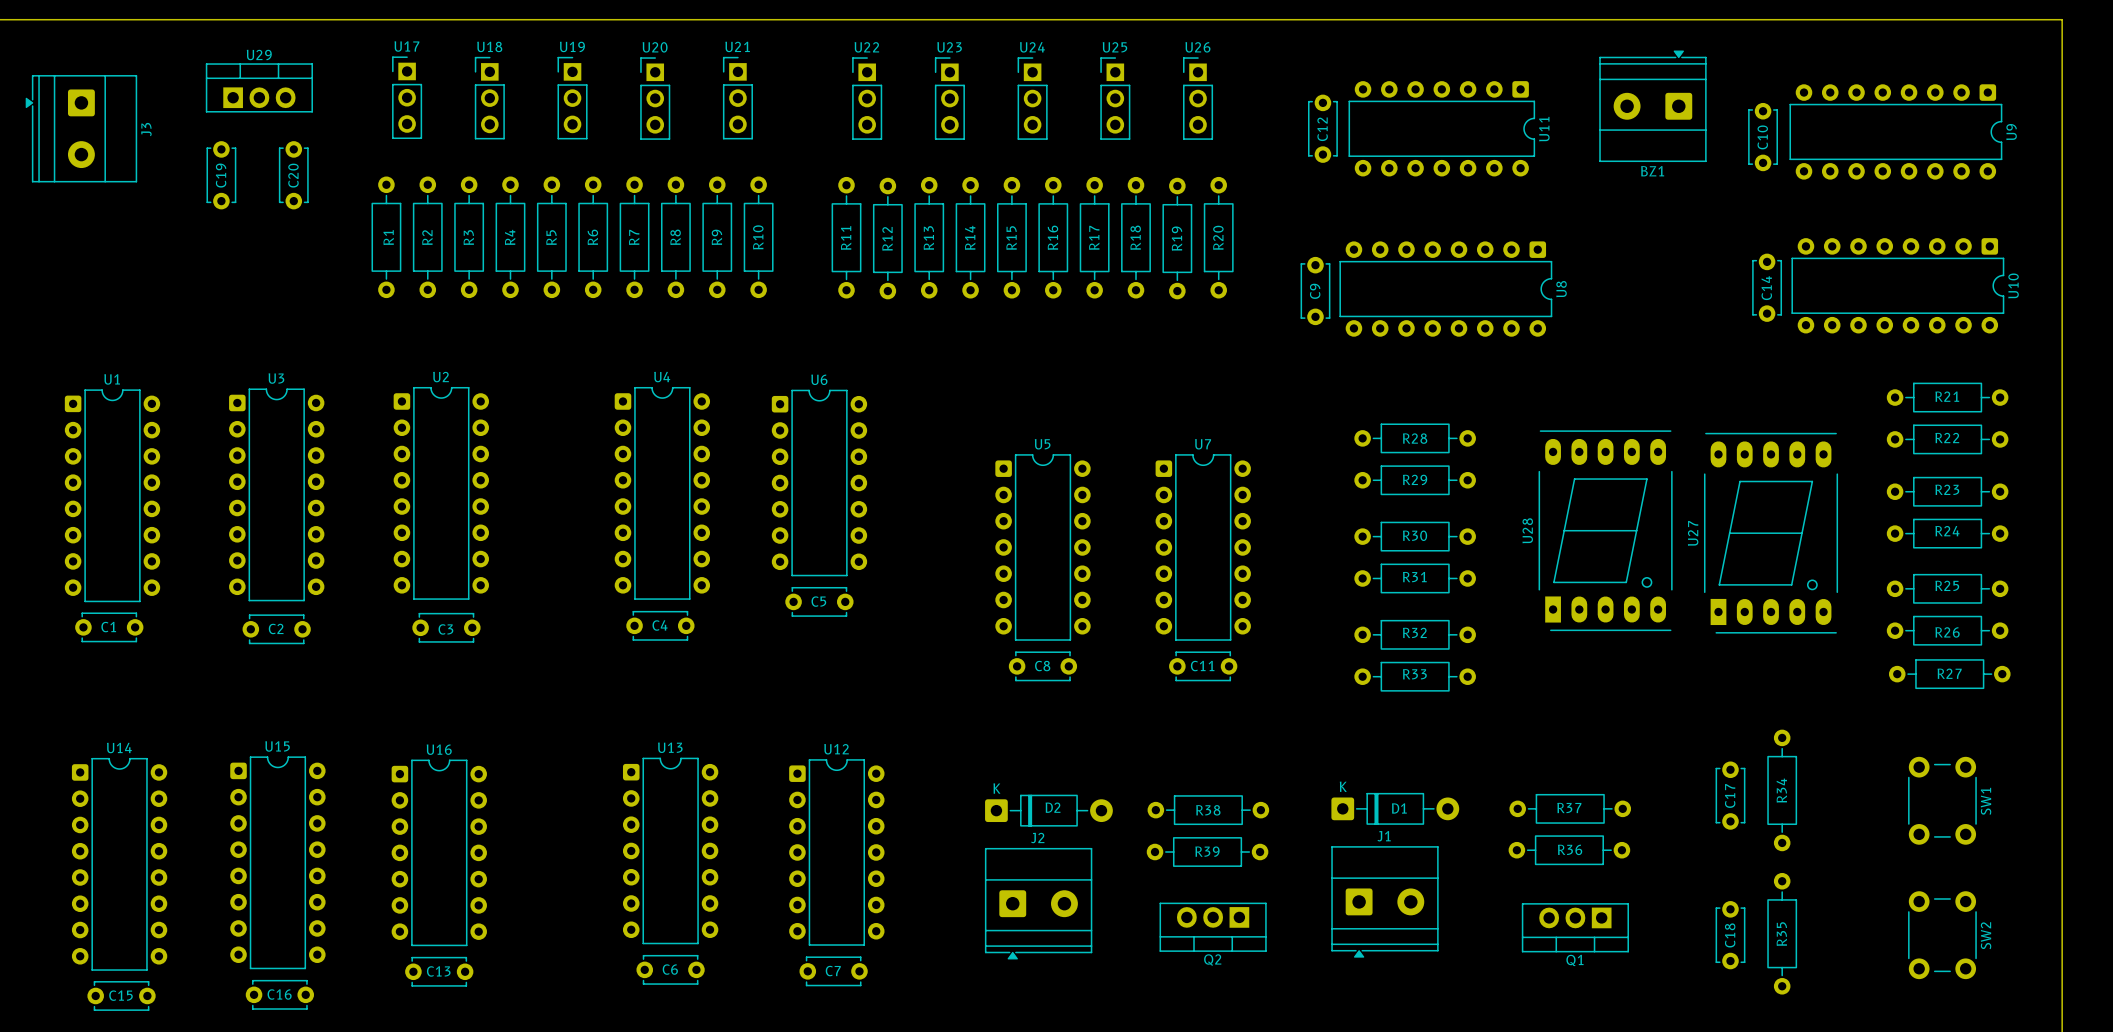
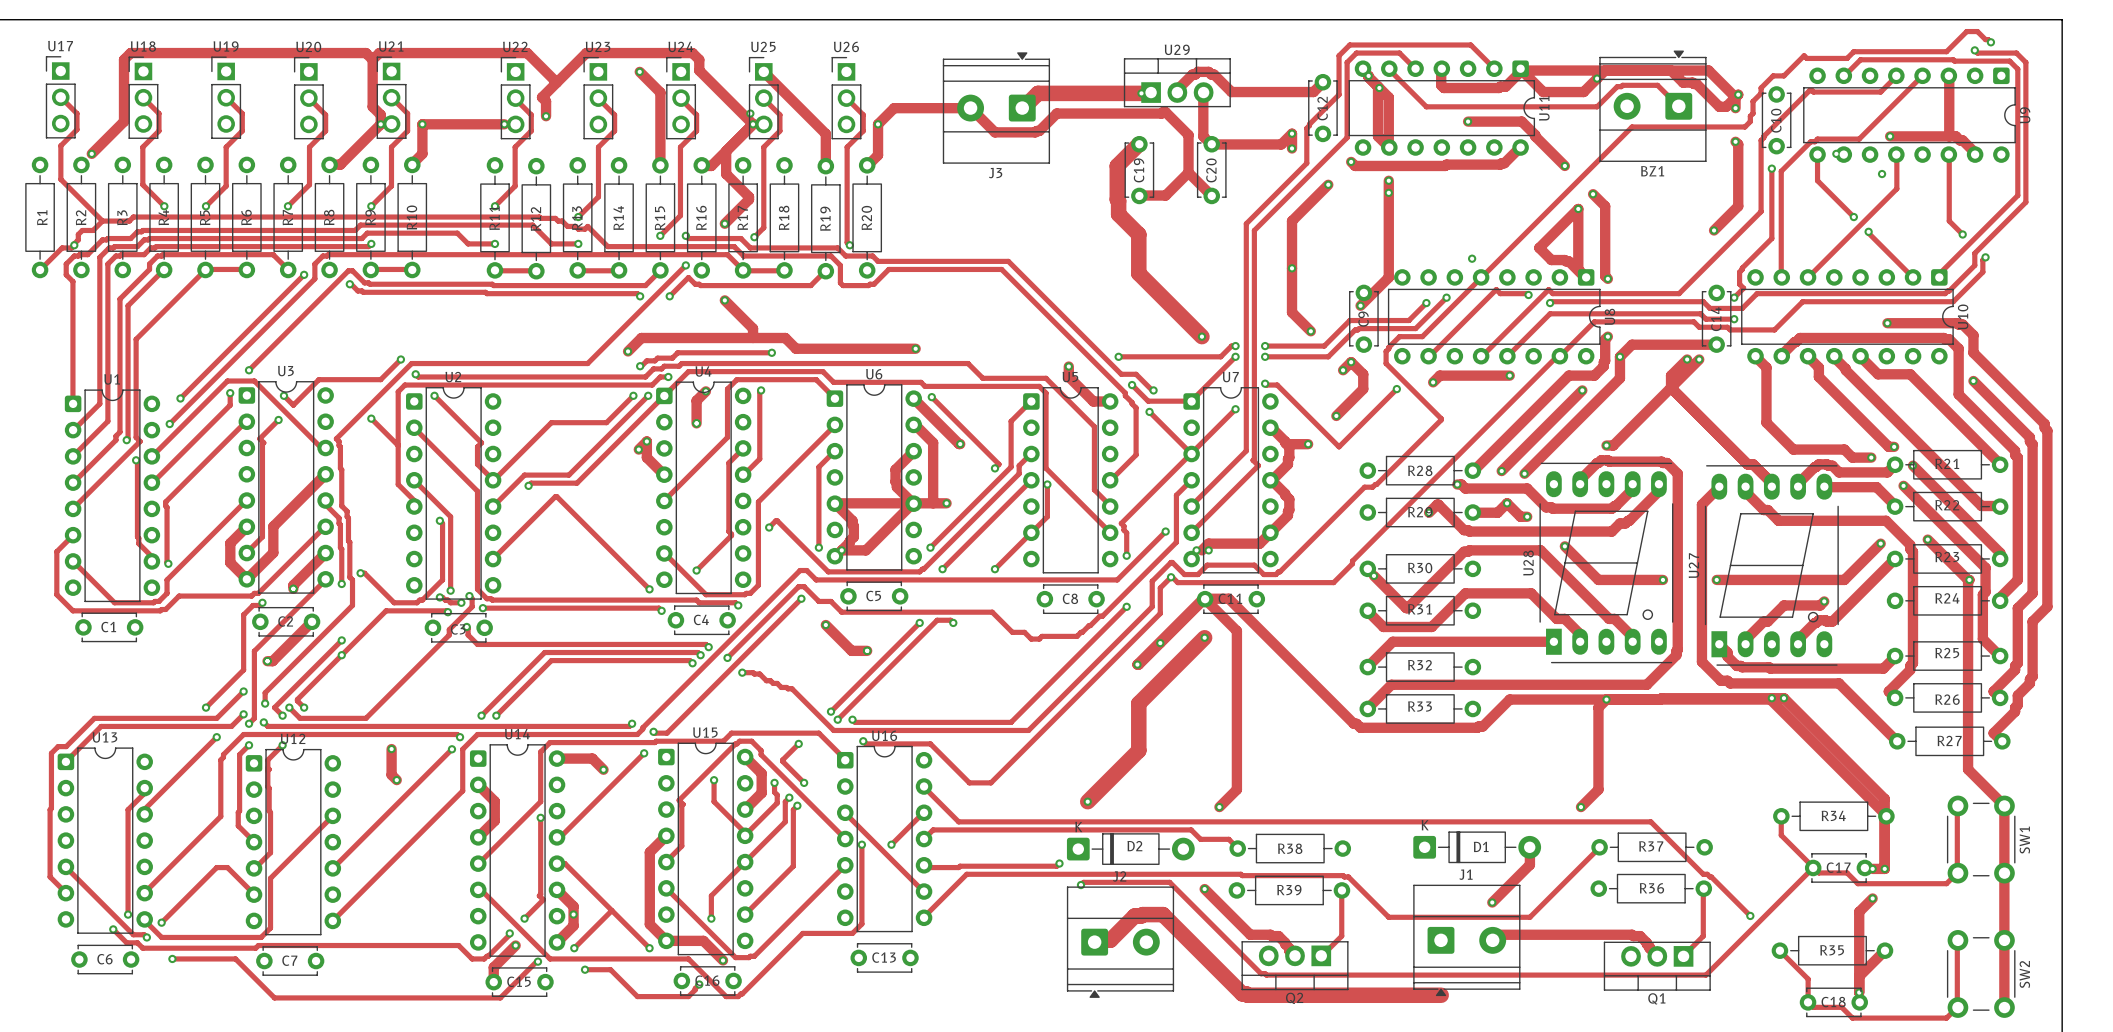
track: none -> (1990, 42) (1977, 31) (1966, 31) (1946, 51) (1853, 51) (1847, 58) (1806, 58) (1804, 55) (1783, 75) (1773, 75) (1761, 88) (1761, 93) (1753, 101) (1753, 113) (1750, 116) (1750, 121) (1744, 126) (1632, 126) (1422, 336) (1399, 336) (1386, 351) (1386, 363) (1441, 419) (1376, 484) (1372, 487) (1364, 487) (1275, 574) (1263, 574) (1254, 565) (1207, 565) (1197, 574) (1184, 574) (1171, 562) (1152, 581) (1152, 606) (1028, 730) (833, 730) (792, 688) (781, 687) (777, 683) (766, 680) (759, 674) (742, 672)
via: none -> (1990, 42)
track: none -> (1974, 50) (1977, 53) (2016, 53) (2025, 62) (2025, 202) (1974, 253) (1974, 265) (1945, 293) (1757, 293) (1742, 308) (1710, 308) (1703, 301) (1550, 303)
via: none -> (1974, 50)
track: none -> (372, 59) (372, 106) (380, 114) (380, 124) (340, 164) (329, 164)
track: none -> (372, 59) (365, 53) (130, 53) (124, 59) (124, 121) (91, 153)
track: none -> (372, 59) (379, 53) (527, 53) (556, 82)
track: none -> (1389, 68) (1426, 106) (1597, 106) (1617, 86) (1622, 85) (1657, 85) (1678, 106)
track: none -> (1415, 68) (1399, 53) (1356, 53) (1347, 62) (1347, 137) (1254, 230) (1253, 460) (1258, 465) (1191, 532)
track: none -> (1441, 68) (1441, 85) (1443, 88) (1505, 86) (1521, 70) (1708, 70) (1735, 97) (1735, 108)
track: none -> (1494, 68) (1470, 44) (1349, 44) (1339, 55) (1339, 94) (1306, 128) (1306, 163) (1246, 223) (1246, 450) (1191, 506)
track: none -> (1520, 68) (1543, 92) (1583, 92) (1605, 70)
track: none -> (1671, 70) (1683, 82) (1696, 83) (1719, 106) (1726, 106) (1738, 94)
track: none -> (639, 71) (660, 92) (660, 165)
via: none -> (639, 71)
track: none -> (763, 71) (825, 133) (825, 166)
track: none -> (1368, 75) (1388, 97) (1388, 147)
via: none -> (1368, 75)
track: none -> (1843, 75) (1860, 59) (2009, 61) (2017, 69) (2017, 195) (1939, 273) (1939, 277)
track: none -> (1896, 75) (1880, 92) (1809, 90) (1763, 136) (1761, 140) (1761, 211) (1679, 293) (1552, 293) (1548, 289) (1481, 356)
track: none -> (1922, 75) (1859, 139) (1817, 139) (1810, 141) (1781, 171) (1781, 277)
track: none -> (1948, 75) (1949, 136)
via: none -> (1597, 78)
track: none -> (1322, 82) (1313, 92) (1231, 92) (1214, 74) (1208, 71) (1197, 71) (1177, 89) (1177, 92)
track: none -> (1378, 86) (1378, 136) (1388, 147)
U29 position: (259, 87) -> (1177, 82)
via: none -> (1379, 88)
track: none -> (1203, 92) (1203, 136) (1211, 144)
track: none -> (1141, 93) (1037, 93) (1022, 108)
via: none -> (1141, 93)
via: none -> (1738, 94)
track: none -> (60, 97) (76, 113) (76, 129) (60, 145) (60, 179) (102, 221)
track: none -> (143, 97) (158, 113) (158, 131) (142, 147) (142, 184) (164, 206)
track: none -> (226, 97) (242, 113) (242, 131) (226, 147) (226, 186) (206, 206)
track: none -> (391, 97) (407, 113) (407, 131) (391, 147) (391, 186) (371, 206)
U17 position: (407, 97) -> (60, 97)
track: none -> (308, 98) (325, 114) (325, 131) (309, 147) (309, 184) (288, 206)
U18 position: (489, 98) -> (143, 97)
track: none -> (515, 98) (531, 114) (531, 131) (515, 147) (515, 186) (494, 206)
U19 position: (572, 98) -> (226, 97)
track: none -> (598, 98) (614, 114) (614, 131) (598, 147) (598, 196) (578, 217)
U20 position: (655, 98) -> (308, 98)
track: none -> (681, 98) (696, 114) (696, 131) (680, 147) (680, 215) (660, 235)
U21 position: (737, 98) -> (391, 97)
track: none -> (763, 98) (779, 114) (779, 131) (763, 147) (763, 227) (754, 237)
track: none -> (846, 98) (863, 114) (863, 131) (847, 147) (847, 242) (849, 245)
U22 position: (867, 98) -> (515, 98)
U23 position: (949, 98) -> (598, 98)
U24 position: (1032, 98) -> (681, 98)
U25 position: (1115, 98) -> (763, 98)
U26 position: (1198, 98) -> (846, 98)
track: none -> (970, 108) (994, 132) (1035, 132) (1039, 131) (1056, 113) (1165, 112) (1188, 135) (1188, 172)
track: none -> (970, 108) (894, 108) (878, 124) (878, 155) (867, 165)
via: none -> (1735, 108)
via: none -> (750, 113)
track: none -> (546, 116) (546, 101) (542, 97) (586, 53) (692, 53) (699, 59) (699, 70) (753, 124) (711, 165) (701, 165)
via: none -> (546, 116)
track: none -> (1468, 121) (1521, 121) (1564, 165)
via: none -> (1468, 121)
via: none -> (380, 124)
via: none -> (422, 124)
track: none -> (504, 124) (422, 124) (422, 153) (412, 164)
via: none -> (504, 124)
via: none -> (753, 124)
via: none -> (878, 124)
J3 rotation: 0° (81, 128) -> 90° clockwise (996, 108)
J3 position: (81, 128) -> (996, 108)
C12 position: (1322, 128) -> (1322, 108)
U11 position: (1441, 128) -> (1441, 108)
U9 position: (1895, 131) -> (1909, 115)
via: none -> (1292, 133)
track: none -> (1890, 136) (1955, 136) (1962, 140) (1975, 154)
via: none -> (1890, 136)
C10 position: (1763, 137) -> (1776, 120)
track: none -> (1735, 141) (1738, 144) (1738, 206) (1714, 230)
via: none -> (1735, 141)
track: none -> (1139, 144) (1117, 165) (1118, 214) (1138, 234) (1138, 273) (1201, 336)
track: none -> (1211, 144) (1281, 144) (1292, 133) (1292, 148)
track: none -> (1520, 147) (1504, 163) (1500, 164) (1355, 165) (1351, 161)
via: none -> (1292, 148)
track: none -> (726, 151) (726, 174) (749, 196) (749, 199) (724, 223)
via: none -> (91, 153)
via: none -> (1836, 153)
track: none -> (1817, 154) (1817, 180) (1853, 217)
track: none -> (1896, 154) (1896, 188) (1808, 277)
track: none -> (1948, 154) (1949, 221) (1962, 234)
via: none -> (1351, 161)
via: none -> (1564, 165)
track: none -> (1771, 168) (1771, 238) (1739, 272) (1739, 284) (1743, 288) (1734, 297)
via: none -> (1771, 168)
track: none -> (1188, 172) (1165, 195) (1139, 195)
track: none -> (1188, 172) (1211, 195)
via: none -> (1882, 174)
C19 position: (221, 175) -> (1139, 170)
C20 position: (293, 175) -> (1211, 170)
track: none -> (1388, 180) (1388, 277) (1360, 305)
via: none -> (1388, 180)
track: none -> (1328, 184) (1292, 221) (1292, 312) (1310, 331)
via: none -> (1328, 184)
via: none -> (1388, 192)
track: none -> (1593, 194) (1605, 206) (1605, 276) (1607, 278)
via: none -> (1593, 194)
via: none -> (164, 206)
via: none -> (206, 206)
via: none -> (288, 206)
via: none -> (371, 206)
via: none -> (494, 206)
via: none -> (1578, 208)
via: none -> (578, 217)
via: none -> (1853, 217)
track: none -> (102, 221) (129, 221) (133, 217) (539, 217) (555, 218) (567, 226) (575, 226) (578, 229) (585, 229) (587, 226) (607, 246) (734, 246) (743, 256) (831, 256) (840, 265) (840, 282) (843, 285) (874, 284) (888, 269) (1001, 269) (1125, 393) (1125, 395) (1136, 407) (1136, 454) (1110, 480)
track: none -> (102, 221) (93, 230) (82, 230) (71, 247) (62, 247) (40, 269)
via: none -> (724, 223)
via: none -> (1714, 230)
track: none -> (1868, 231) (1912, 277)
via: none -> (1868, 231)
via: none -> (1962, 234)
via: none -> (660, 235)
track: none -> (685, 235) (688, 238) (740, 238) (750, 247) (837, 247) (845, 256) (872, 256) (878, 261) (1008, 261) (1121, 374) (1136, 374) (1153, 390)
via: none -> (685, 235)
R1 position: (386, 237) -> (40, 217)
R2 position: (427, 237) -> (81, 217)
R3 position: (469, 237) -> (122, 217)
R4 position: (510, 237) -> (164, 217)
R5 position: (551, 237) -> (205, 217)
R6 position: (593, 237) -> (246, 217)
R7 position: (634, 237) -> (288, 217)
R8 position: (675, 237) -> (329, 217)
R9 position: (717, 237) -> (370, 217)
via: none -> (754, 237)
R10 position: (758, 237) -> (412, 217)
R11 position: (846, 237) -> (494, 217)
R13 position: (929, 237) -> (577, 217)
R14 position: (970, 237) -> (619, 217)
R15 position: (1011, 237) -> (660, 217)
R16 position: (1053, 237) -> (701, 217)
R17 position: (1094, 237) -> (743, 217)
R18 position: (1136, 237) -> (784, 217)
R20 position: (1218, 237) -> (867, 217)
R12 position: (887, 238) -> (536, 218)
R19 position: (1177, 238) -> (825, 218)
track: none -> (371, 243) (368, 246) (156, 246) (150, 247) (144, 254) (115, 256) (107, 264) (107, 421) (72, 456)
via: none -> (371, 243)
track: none -> (494, 243) (468, 243) (457, 233) (367, 233) (361, 238) (149, 238) (144, 239) (137, 246) (109, 247) (99, 257) (99, 403) (73, 430)
via: none -> (494, 243)
track: none -> (578, 243) (551, 243) (532, 225) (360, 225) (355, 230) (142, 230) (137, 231) (130, 238) (102, 239) (87, 254) (74, 256) (66, 264) (66, 274) (72, 281) (72, 403)
via: none -> (578, 243)
via: none -> (74, 245)
via: none -> (849, 245)
track: none -> (1985, 257) (1982, 260) (1982, 272) (1953, 301) (1802, 301) (1774, 329) (1730, 329) (1727, 327) (1699, 327) (1693, 321) (1594, 321) (1559, 356)
via: none -> (1985, 257)
via: none -> (1472, 258)
track: none -> (685, 265) (587, 363) (411, 363) (336, 438) (340, 446) (341, 506) (347, 511) (348, 518) (352, 605) (265, 692) (265, 703)
via: none -> (685, 265)
via: none -> (1292, 268)
track: none -> (164, 269) (128, 305) (126, 440)
track: none -> (246, 269) (206, 269) (136, 339) (136, 437) (140, 441) (73, 508)
track: none -> (288, 269) (273, 254) (157, 256) (149, 264) (149, 269) (119, 299) (119, 432) (115, 436) (115, 440) (73, 482)
track: none -> (370, 269) (412, 269)
track: none -> (494, 270) (536, 271)
track: none -> (577, 270) (619, 270)
track: none -> (660, 270) (645, 285) (369, 284) (364, 282) (352, 270) (348, 270) (249, 370)
track: none -> (743, 270) (727, 254) (322, 256) (314, 264) (314, 278) (169, 424)
track: none -> (784, 270) (743, 270)
track: none -> (825, 271) (810, 285) (700, 285) (695, 284) (688, 277) (669, 296)
track: none -> (304, 274) (180, 398)
via: none -> (304, 274)
track: none -> (1586, 277) (1578, 269) (1578, 208) (1539, 247) (1551, 260) (1568, 261) (1586, 277)
via: none -> (1607, 278)
track: none -> (349, 284) (357, 290) (363, 292) (637, 293) (640, 296)
via: none -> (349, 284)
U10 position: (1897, 285) -> (1847, 316)
C14 position: (1767, 287) -> (1716, 318)
U8 position: (1445, 289) -> (1494, 316)
C9 position: (1315, 291) -> (1363, 318)
track: none -> (1528, 294) (1500, 293) (1496, 289) (1428, 356)
via: none -> (1528, 294)
via: none -> (640, 296)
via: none -> (669, 296)
track: none -> (1446, 297) (1415, 328) (1359, 328) (1355, 329) (1328, 356) (1265, 356)
via: none -> (1446, 297)
via: none -> (1734, 297)
track: none -> (724, 300) (753, 328) (753, 338)
via: none -> (724, 300)
track: none -> (1426, 303) (1408, 320) (1349, 320) (1324, 346) (1265, 346)
via: none -> (1426, 303)
via: none -> (1550, 303)
via: none -> (1360, 305)
track: none -> (1734, 319) (1705, 319) (1700, 313) (1550, 313) (1507, 356)
via: none -> (1734, 319)
track: none -> (1887, 323) (1962, 324) (1973, 335) (1973, 352) (2044, 424) (2047, 430) (2047, 606) (2032, 621) (2032, 676) (2029, 683) (2017, 695) (2017, 704) (2015, 711) (1993, 733) (2002, 741)
via: none -> (1887, 323)
via: none -> (1310, 331)
via: none -> (1201, 336)
track: none -> (1607, 336) (1605, 339) (1603, 366) (1594, 375) (1568, 375) (1472, 470)
via: none -> (1607, 336)
track: none -> (1716, 344) (1632, 344) (1619, 356) (1619, 378) (1524, 473)
track: none -> (1235, 346) (1231, 346) (1220, 356) (1118, 356)
via: none -> (1235, 346)
via: none -> (1265, 346)
track: none -> (915, 348) (796, 348) (785, 338) (641, 338) (628, 351)
via: none -> (915, 348)
via: none -> (628, 351)
track: none -> (771, 352) (677, 352) (672, 358) (657, 358) (654, 360) (646, 360) (640, 366)
via: none -> (771, 352)
via: none -> (1118, 356)
track: none -> (1235, 356) (1191, 401)
via: none -> (1235, 356)
via: none -> (1265, 356)
track: none -> (1559, 356) (1556, 356) (1352, 561) (1352, 563) (1333, 582) (1177, 582) (1171, 577) (1160, 588) (1160, 613) (990, 782) (969, 782) (930, 743) (865, 743) (863, 741)
via: none -> (1619, 356)
track: none -> (1755, 356) (1766, 367) (1766, 422) (1793, 449) (1844, 449) (1852, 457) (1871, 457)
track: none -> (1781, 356) (1800, 338) (1943, 338) (1949, 339) (1958, 348) (1958, 394) (2015, 450) (2017, 457) (2017, 579) (2000, 597) (2000, 600)
track: none -> (1808, 356) (1818, 367) (1818, 376) (1888, 446) (1894, 446)
track: none -> (1834, 356) (1845, 370) (1981, 506) (2000, 506)
track: none -> (1860, 356) (1878, 374) (1910, 374) (2000, 464)
track: none -> (400, 359) (380, 379) (318, 379) (293, 405) (283, 395)
via: none -> (400, 359)
track: none -> (1687, 359) (1671, 375) (1671, 387) (1747, 464) (1753, 464) (1773, 484) (1771, 487) (1771, 483)
via: none -> (1687, 359)
track: none -> (1699, 359) (1613, 445) (1606, 445)
via: none -> (1699, 359)
via: none -> (1351, 362)
via: none -> (640, 366)
track: none -> (1068, 366) (1068, 376) (1093, 401) (1110, 401)
via: none -> (1068, 366)
via: none -> (249, 370)
track: none -> (1343, 370) (1351, 362) (1363, 374) (1363, 389) (1336, 415)
via: none -> (1343, 370)
track: none -> (415, 374) (418, 376) (645, 376) (653, 368) (661, 368) (664, 366) (679, 366) (681, 363) (968, 363) (982, 378) (1046, 378) (1094, 426) (1094, 489) (1110, 506)
via: none -> (415, 374)
track: none -> (1509, 375) (1439, 375) (1433, 382)
via: none -> (1509, 375)
track: none -> (668, 376) (660, 376) (652, 385) (404, 385) (398, 391) (398, 484) (414, 500) (414, 506)
via: none -> (668, 376)
track: none -> (1973, 381) (2029, 437) (2032, 444) (2032, 593) (2017, 608) (2017, 663) (2015, 669) (1993, 691) (2000, 697)
via: none -> (1973, 381)
via: none -> (1433, 382)
track: none -> (1265, 383) (1277, 385) (1339, 446) (1396, 389)
via: none -> (1265, 383)
track: none -> (1132, 385) (1148, 401) (1191, 401)
via: none -> (1132, 385)
via: none -> (1396, 389)
track: none -> (761, 390) (759, 458) (743, 474)
via: none -> (761, 390)
via: none -> (1153, 390)
track: none -> (1582, 390) (1501, 471)
via: none -> (1582, 390)
track: none -> (705, 391) (696, 400) (696, 423)
via: none -> (705, 391)
track: none -> (230, 393) (230, 405) (151, 482)
via: none -> (230, 393)
via: none -> (283, 395)
track: none -> (434, 395) (481, 442) (477, 446) (477, 464) (493, 480)
via: none -> (434, 395)
track: none -> (633, 395) (606, 422) (551, 422) (493, 480)
via: none -> (633, 395)
track: none -> (648, 395) (568, 475) (524, 475) (493, 506)
via: none -> (648, 395)
track: none -> (931, 397) (999, 464) (994, 468)
via: none -> (931, 397)
R21 position: (1947, 397) -> (1947, 464)
via: none -> (180, 398)
track: none -> (835, 398) (816, 379) (736, 379) (727, 389) (727, 437) (664, 500)
track: none -> (913, 398) (960, 444)
track: none -> (1031, 401) (1011, 421) (1011, 467) (930, 547)
track: none -> (1235, 409) (1121, 523) (1126, 532) (1126, 555)
via: none -> (1235, 409)
track: none -> (1149, 411) (1191, 454)
via: none -> (1149, 411)
via: none -> (1336, 415)
track: none -> (371, 418) (398, 445)
via: none -> (371, 418)
track: none -> (278, 419) (259, 438) (263, 442) (262, 536) (246, 553)
via: none -> (278, 419)
track: none -> (246, 421) (165, 501) (168, 563)
via: none -> (696, 423)
via: none -> (169, 424)
track: none -> (834, 424) (758, 501) (758, 585) (750, 593) (706, 594) (664, 553)
track: none -> (913, 424) (933, 442) (933, 503)
track: none -> (414, 427) (477, 491) (477, 589) (486, 598) (696, 600) (699, 602) (735, 602) (738, 605)
track: none -> (1270, 427) (1289, 446) (1287, 464) (1271, 480)
R28 position: (1415, 438) -> (1420, 470)
R22 position: (1947, 439) -> (1947, 506)
via: none -> (126, 440)
via: none -> (646, 441)
via: none -> (960, 444)
track: none -> (1286, 444) (1308, 444)
via: none -> (1308, 444)
via: none -> (1606, 445)
via: none -> (1894, 446)
track: none -> (325, 448) (321, 448) (254, 381) (227, 381) (151, 456)
track: none -> (743, 448) (728, 463) (728, 531) (731, 535) (696, 570)
track: none -> (638, 449) (646, 441) (646, 457) (664, 474)
via: none -> (638, 449)
track: none -> (834, 451) (818, 467) (818, 547)
track: none -> (913, 451) (895, 469) (896, 487) (912, 503) (865, 550) (841, 550) (853, 536) (853, 526) (852, 520) (835, 503)
track: none -> (1031, 454) (1019, 465) (1019, 473) (919, 571) (828, 571) (777, 520) (769, 527)
via: none -> (1871, 457)
track: none -> (136, 460) (137, 536) (138, 543) (152, 557) (151, 561)
via: none -> (136, 460)
track: none -> (1895, 464) (1887, 472) (1839, 472) (1832, 465) (1818, 464) (1798, 483) (1798, 486)
track: none -> (1912, 465) (2000, 553) (2000, 558)
via: none -> (1912, 465)
via: none -> (994, 468)
via: none -> (1501, 471)
via: none -> (1524, 473)
track: none -> (325, 474) (273, 526) (273, 552) (246, 579) (230, 562) (230, 543) (246, 526)
track: none -> (414, 480) (450, 516) (450, 590)
track: none -> (1031, 480) (942, 569)
track: none -> (1191, 480) (1176, 495) (1176, 542) (1102, 616) (1099, 616) (1076, 636) (1042, 636) (1039, 639) (1031, 639) (1024, 632) (1012, 632) (992, 612) (841, 612) (831, 601) (818, 601) (804, 586) (798, 586) (727, 657)
track: none -> (1271, 480) (1289, 499) (1287, 515) (1259, 543) (1208, 543) (1201, 550)
R29 position: (1415, 480) -> (1420, 512)
U6 position: (819, 483) -> (874, 477)
track: none -> (1047, 484) (1047, 516) (994, 569)
via: none -> (1047, 484)
via: none -> (1457, 484)
track: none -> (1580, 484) (1579, 480) (1601, 460) (1661, 461) (1667, 463) (1677, 473) (1676, 655) (1646, 684) (1391, 684) (1367, 708)
track: none -> (1632, 484) (1632, 489) (1611, 508) (1552, 508) (1546, 507) (1527, 488) (1465, 488) (1461, 484) (1457, 484)
track: none -> (1658, 484) (1658, 491) (1629, 520) (1619, 523) (1611, 531) (1469, 531) (1464, 530) (1438, 504) (1429, 512)
track: none -> (528, 485) (531, 483) (576, 483) (688, 371) (822, 371) (833, 382) (921, 382) (925, 386) (1039, 386) (1046, 393) (1046, 468) (1110, 532)
via: none -> (528, 485)
track: none -> (1903, 485) (1985, 567) (1985, 592) (1982, 594) (1982, 639) (2000, 656)
via: none -> (1903, 485)
track: none -> (1719, 486) (1701, 504) (1701, 661) (1720, 680) (1727, 680) (1730, 683) (1839, 683) (1897, 741)
track: none -> (1745, 486) (1744, 491) (1763, 510) (1767, 510) (1778, 520) (1886, 520) (1910, 544) (1912, 551) (1912, 663) (1910, 669) (1888, 691) (1895, 697)
track: none -> (1824, 486) (1876, 487) (1895, 506)
R23 position: (1947, 491) -> (1947, 558)
U2 position: (441, 493) -> (453, 493)
U4 position: (662, 493) -> (703, 487)
U3 position: (276, 494) -> (286, 487)
track: none -> (246, 500) (167, 579) (167, 593) (158, 601) (114, 602) (73, 561)
track: none -> (325, 500) (325, 504) (339, 518) (340, 524) (341, 583)
track: none -> (835, 503) (946, 503)
via: none -> (946, 503)
via: none -> (1507, 503)
via: none -> (1429, 512)
track: none -> (1472, 512) (1497, 512) (1507, 503) (1520, 516) (1527, 516)
via: none -> (1527, 516)
track: none -> (439, 520) (442, 523) (442, 579) (422, 600) (417, 602) (394, 602) (364, 573) (360, 573)
via: none -> (439, 520)
track: none -> (325, 526) (258, 593) (251, 596) (179, 596) (165, 609) (160, 610) (72, 610) (56, 594) (56, 551) (73, 535)
via: none -> (769, 527)
U28 position: (1605, 530) -> (1606, 562)
track: none -> (1165, 531) (1117, 579) (816, 579) (806, 570) (800, 570) (637, 734) (477, 734) (462, 749) (462, 790) (332, 920)
via: none -> (1165, 531)
U27 position: (1771, 533) -> (1771, 565)
R24 position: (1947, 533) -> (1947, 600)
R30 position: (1415, 536) -> (1420, 568)
track: none -> (1927, 539) (1969, 579) (1968, 769) (2004, 805)
via: none -> (1927, 539)
track: none -> (1880, 543) (1844, 579) (1716, 579)
via: none -> (1880, 543)
track: none -> (1564, 546) (1598, 579) (1662, 579)
via: none -> (1564, 546)
via: none -> (818, 547)
via: none -> (930, 547)
U5 position: (1043, 547) -> (1070, 480)
U7 position: (1203, 547) -> (1231, 480)
via: none -> (841, 550)
via: none -> (1196, 550)
via: none -> (1208, 550)
track: none -> (325, 553) (293, 585) (293, 588)
via: none -> (1126, 555)
track: none -> (1895, 558) (1832, 621) (1818, 620) (1798, 639) (1798, 644)
track: none -> (493, 559) (556, 496) (649, 589)
via: none -> (168, 563)
via: none -> (942, 569)
via: none -> (994, 569)
via: none -> (696, 570)
via: none -> (360, 573)
track: none -> (1374, 575) (1407, 608) (1464, 551) (1540, 550) (1609, 618) (1614, 618) (1632, 636) (1632, 641)
via: none -> (1374, 575)
via: none -> (1171, 577)
R31 position: (1415, 578) -> (1420, 610)
track: none -> (325, 579) (254, 651) (254, 718) (249, 723)
via: none -> (1662, 579)
via: none -> (1716, 579)
via: none -> (1969, 579)
via: none -> (341, 583)
via: none -> (293, 588)
R25 position: (1947, 588) -> (1947, 656)
via: none -> (649, 589)
via: none -> (450, 590)
track: none -> (469, 596) (472, 598) (472, 606) (449, 629) (449, 635) (365, 718) (300, 718) (289, 707)
via: none -> (469, 596)
track: none -> (439, 597) (450, 602) (461, 602)
via: none -> (439, 597)
track: none -> (801, 598) (667, 733) (653, 731)
via: none -> (801, 598)
track: none -> (1204, 598) (1138, 664) (1137, 664) (1203, 598) (1228, 598) (1353, 723) (1360, 727) (1477, 727) (1482, 726) (1509, 699) (1770, 699)
track: none -> (1204, 598) (1236, 631) (1236, 789) (1219, 807)
C5 position: (819, 601) -> (874, 596)
track: none -> (1824, 601) (1820, 605) (1783, 605) (1744, 640) (1745, 644)
via: none -> (1824, 601)
track: none -> (262, 602) (259, 605) (253, 605) (243, 614) (243, 669) (206, 707)
via: none -> (262, 602)
via: none -> (461, 602)
via: none -> (738, 605)
track: none -> (1126, 606) (1011, 722) (855, 722) (852, 719)
via: none -> (1126, 606)
track: none -> (482, 608) (658, 608) (661, 610)
via: none -> (482, 608)
via: none -> (661, 610)
track: none -> (1367, 610) (1383, 626) (1431, 626) (1465, 593) (1531, 593) (1556, 618) (1564, 618) (1579, 633) (1580, 641)
track: none -> (447, 612) (386, 610) (297, 699) (304, 707)
via: none -> (447, 612)
track: none -> (312, 621) (272, 661) (267, 661)
track: none -> (919, 622) (831, 711)
via: none -> (919, 622)
track: none -> (953, 622) (950, 620) (937, 620) (837, 719)
via: none -> (953, 622)
C4 position: (660, 625) -> (701, 620)
track: none -> (825, 625) (851, 650) (867, 650)
via: none -> (825, 625)
track: none -> (466, 626) (468, 635) (477, 644) (706, 644) (708, 647)
via: none -> (466, 626)
C3 position: (446, 627) -> (458, 627)
C2 position: (276, 629) -> (286, 621)
R26 position: (1947, 630) -> (1947, 697)
R32 position: (1415, 634) -> (1420, 667)
track: none -> (1204, 637) (1138, 703) (1138, 750) (1087, 801)
via: none -> (1204, 637)
track: none -> (341, 640) (274, 707) (282, 715)
via: none -> (341, 640)
track: none -> (1554, 641) (1392, 641) (1367, 667)
via: none -> (1160, 643)
track: none -> (1719, 644) (1727, 652) (1727, 656) (1736, 665) (1742, 667) (1883, 668) (1895, 656)
via: none -> (708, 647)
via: none -> (867, 650)
via: none -> (341, 655)
track: none -> (700, 655) (697, 652) (544, 652) (481, 715)
via: none -> (700, 655)
via: none -> (727, 657)
via: none -> (267, 661)
track: none -> (692, 663) (689, 660) (551, 660) (496, 715)
via: none -> (692, 663)
via: none -> (1137, 664)
C8 position: (1042, 666) -> (1070, 599)
C11 position: (1203, 666) -> (1230, 599)
via: none -> (742, 672)
R27 position: (1949, 674) -> (1949, 741)
R33 position: (1415, 676) -> (1420, 708)
track: none -> (243, 691) (216, 718) (94, 718) (66, 746) (58, 746) (51, 753) (50, 876) (65, 893)
via: none -> (243, 691)
via: none -> (1771, 698)
via: none -> (1783, 698)
track: none -> (1606, 699) (1598, 707) (1598, 789) (1580, 807)
via: none -> (1606, 699)
track: none -> (1660, 699) (1783, 698) (1884, 799) (1884, 868) (1872, 868)
track: none -> (1770, 699) (1884, 813)
via: none -> (265, 703)
via: none -> (206, 707)
via: none -> (289, 707)
via: none -> (304, 707)
via: none -> (831, 711)
track: none -> (243, 714) (231, 726) (101, 726) (65, 761)
via: none -> (243, 714)
via: none -> (282, 715)
via: none -> (481, 715)
via: none -> (496, 715)
via: none -> (837, 719)
via: none -> (852, 719)
track: none -> (263, 722) (267, 726) (629, 726) (632, 723)
via: none -> (263, 722)
via: none -> (249, 723)
via: none -> (632, 723)
via: none -> (653, 731)
track: none -> (216, 737) (144, 809) (144, 814)
via: none -> (216, 737)
track: none -> (460, 737) (457, 734) (243, 734) (223, 754) (220, 760) (220, 816) (144, 893)
via: none -> (460, 737)
via: none -> (863, 741)
track: none -> (798, 743) (782, 761) (804, 782)
via: none -> (798, 743)
track: none -> (249, 745) (239, 754) (238, 825) (254, 842)
via: none -> (249, 745)
track: none -> (282, 745) (267, 760) (270, 852) (254, 868)
via: none -> (282, 745)
track: none -> (391, 749) (391, 774) (396, 780)
via: none -> (391, 749)
track: none -> (451, 749) (332, 868)
via: none -> (451, 749)
track: none -> (644, 753) (559, 837) (557, 837)
via: none -> (644, 753)
track: none -> (745, 757) (761, 773) (761, 793) (745, 809)
track: none -> (557, 758) (592, 758) (603, 769)
track: none -> (845, 760) (818, 733) (731, 733) (723, 741) (550, 742) (540, 751) (540, 801) (478, 863)
via: none -> (603, 769)
via: none -> (396, 780)
track: none -> (714, 780) (714, 801) (746, 833)
via: none -> (714, 780)
track: none -> (774, 782) (777, 803) (745, 835)
via: none -> (774, 782)
via: none -> (804, 782)
track: none -> (478, 784) (494, 801) (494, 820) (478, 837)
track: none -> (924, 786) (958, 821) (1650, 821) (1703, 874) (1711, 876) (1750, 915)
track: none -> (144, 788) (144, 793) (128, 809) (128, 914)
R34 rotation: 0° (1782, 790) -> 90° clockwise (1833, 816)
C17 rotation: 0° (1730, 795) -> 90° clockwise (1839, 867)
C17 position: (1730, 795) -> (1839, 867)
track: none -> (789, 797) (785, 801) (785, 821) (711, 895) (711, 918)
via: none -> (789, 797)
SW1 position: (1942, 800) -> (1981, 839)
via: none -> (1087, 801)
track: none -> (797, 805) (793, 809) (793, 866) (744, 914)
via: none -> (797, 805)
track: none -> (1957, 805) (1957, 872)
track: none -> (2004, 805) (2004, 1007)
via: none -> (1219, 807)
via: none -> (1580, 807)
D1 position: (1395, 808) -> (1477, 847)
R37 position: (1570, 808) -> (1652, 847)
D2 position: (1048, 810) -> (1130, 849)
R38 position: (1208, 810) -> (1290, 848)
track: none -> (845, 812) (924, 891)
track: none -> (924, 812) (891, 844)
track: none -> (332, 815) (270, 878) (270, 928) (261, 937) (161, 937) (144, 919)
track: none -> (1781, 816) (1781, 835) (1818, 872) (1847, 872) (1857, 883) (1946, 883) (1957, 872)
track: none -> (540, 817) (539, 895) (543, 899) (524, 918)
via: none -> (540, 817)
track: none -> (666, 835) (649, 852) (649, 924) (666, 940) (703, 940) (723, 960)
track: none -> (845, 839) (761, 754) (761, 750) (751, 741) (739, 741) (679, 800) (683, 804) (681, 846) (666, 862)
track: none -> (923, 839) (933, 829) (1191, 829) (1200, 839) (1228, 839) (1237, 848)
track: none -> (861, 844) (861, 924) (852, 933) (802, 933) (738, 996) (726, 996) (688, 958) (550, 958) (481, 890) (478, 889)
via: none -> (861, 844)
via: none -> (891, 844)
track: none -> (1529, 847) (1529, 864) (1492, 902)
track: none -> (1599, 847) (1529, 917) (1388, 917) (1348, 876) (1343, 875) (966, 874) (924, 917)
U13 position: (670, 850) -> (105, 840)
R36 position: (1569, 850) -> (1651, 888)
U16 position: (439, 852) -> (884, 839)
U12 position: (836, 852) -> (293, 842)
R39 position: (1207, 852) -> (1289, 890)
U15 position: (277, 862) -> (705, 848)
track: none -> (557, 863) (564, 863) (649, 948)
track: none -> (1059, 863) (1056, 866) (958, 867) (926, 867) (924, 865)
via: none -> (1059, 863)
U14 position: (119, 864) -> (517, 850)
track: none -> (845, 865) (754, 956) (749, 957) (735, 957) (666, 888)
track: none -> (65, 866) (133, 934) (144, 934) (146, 937)
track: none -> (1813, 867) (1705, 975) (1266, 975) (1261, 973) (1169, 882) (1083, 882) (1080, 885)
via: none -> (1872, 868)
via: none -> (1884, 868)
via: none -> (1080, 885)
track: none -> (1703, 888) (1703, 936) (1683, 956)
track: none -> (557, 889) (573, 906) (573, 925) (557, 942)
track: none -> (1204, 889) (1250, 934) (1278, 936) (1295, 955)
via: none -> (1204, 889)
track: none -> (1341, 890) (1341, 936) (1321, 955)
track: none -> (254, 894) (227, 867) (216, 867) (161, 922)
track: none -> (1872, 898) (1859, 911) (1859, 992)
via: none -> (1872, 898)
J1 position: (1384, 901) -> (1466, 940)
Q2 footprint: [1159, 902, 1267, 952] -> [1241, 941, 1349, 991]
via: none -> (1492, 902)
J2 position: (1038, 903) -> (1120, 942)
track: none -> (611, 910) (574, 948)
via: none -> (128, 914)
via: none -> (573, 914)
via: none -> (1750, 915)
via: none -> (524, 918)
via: none -> (711, 918)
via: none -> (161, 922)
Q1 position: (1575, 927) -> (1657, 966)
track: none -> (113, 929) (126, 942) (137, 942) (142, 948) (255, 948) (258, 945) (458, 945) (472, 958) (484, 958) (488, 956) (509, 933)
via: none -> (113, 929)
via: none -> (509, 933)
R35 rotation: 0° (1782, 933) -> 90° clockwise (1832, 950)
C18 rotation: 0° (1730, 935) -> 90° clockwise (1833, 1002)
C18 position: (1730, 935) -> (1833, 1002)
SW2 position: (1942, 935) -> (1981, 973)
via: none -> (146, 937)
track: none -> (1492, 940) (1497, 934) (1632, 934) (1640, 936) (1657, 956)
track: none -> (1957, 940) (1957, 1007)
track: none -> (1094, 942) (1095, 940) (1110, 940) (1134, 915) (1162, 914) (1242, 993) (1441, 995)
track: none -> (515, 945) (493, 967) (493, 982)
via: none -> (515, 945)
via: none -> (574, 948)
via: none -> (649, 948)
track: none -> (1779, 950) (1808, 979) (1808, 1001)
track: none -> (1884, 950) (1859, 976)
track: none -> (172, 958) (235, 958) (274, 997) (500, 997) (537, 961)
via: none -> (172, 958)
via: none -> (723, 960)
via: none -> (537, 961)
track: none -> (585, 969) (610, 969) (637, 996) (688, 996) (699, 984)
via: none -> (585, 969)
C6 position: (670, 969) -> (105, 959)
C13 position: (439, 971) -> (884, 957)
C7 position: (833, 971) -> (290, 961)
via: none -> (699, 984)
via: none -> (1859, 992)
C16 position: (279, 994) -> (707, 980)
C15 position: (121, 995) -> (519, 982)
track: none -> (1808, 1001) (1813, 1007) (1841, 1007) (1852, 1018) (1946, 1018) (1957, 1007)

